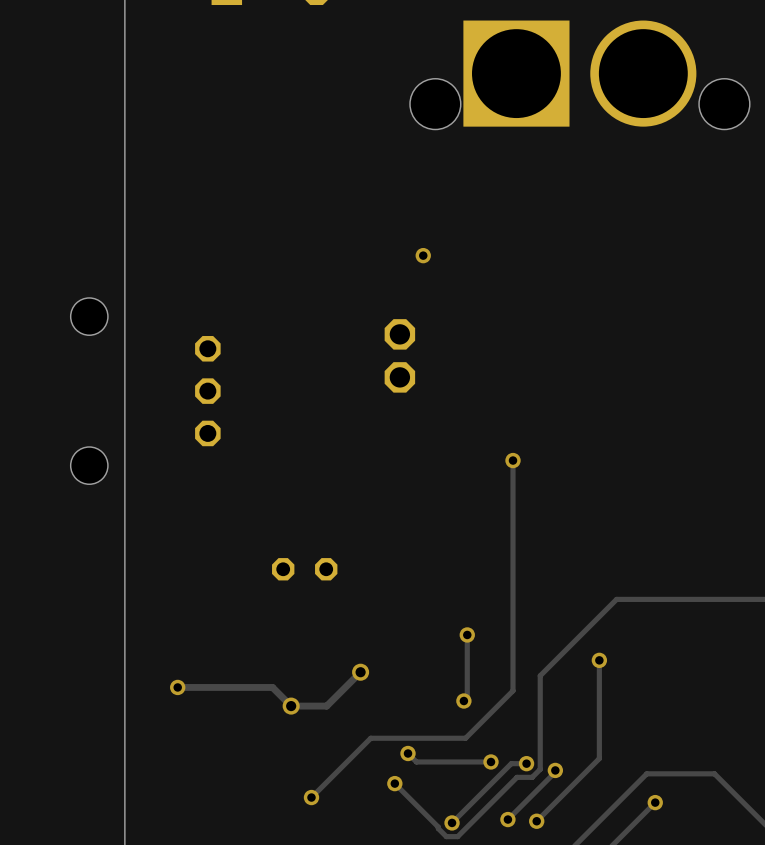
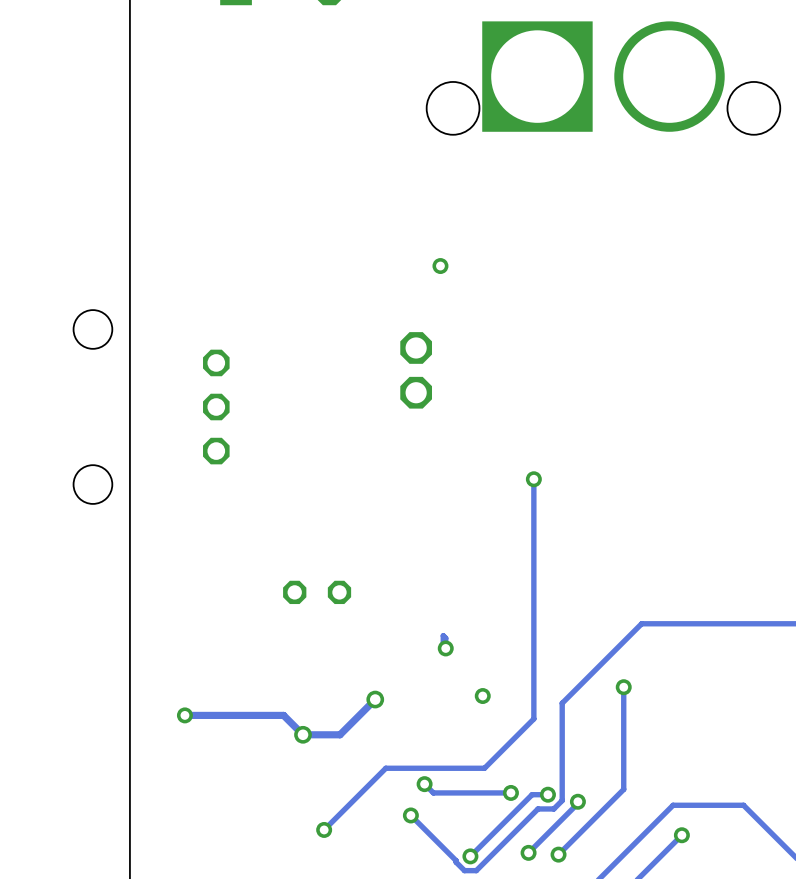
track: none -> (445, 646) (443, 644) (443, 635) (445, 638) (445, 648)
via: none -> (445, 648)
track: (467, 634) (467, 697) (463, 701) -> none
via: (467, 634) -> none
via: none -> (482, 696)
via: (463, 701) -> none

